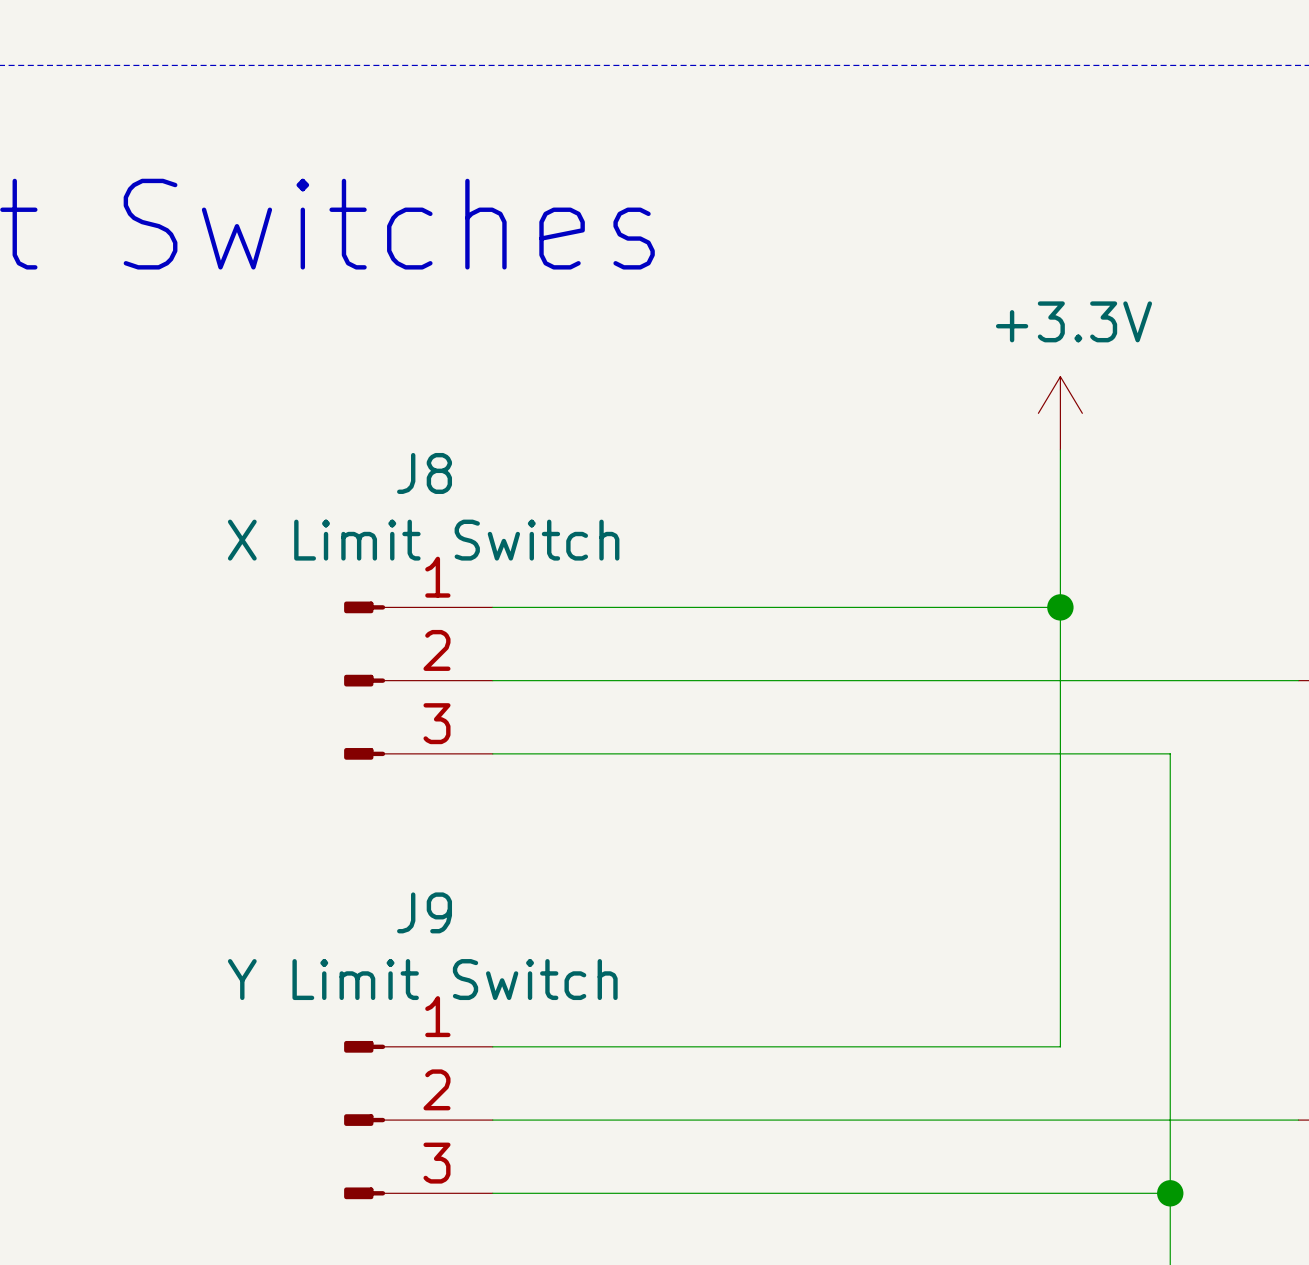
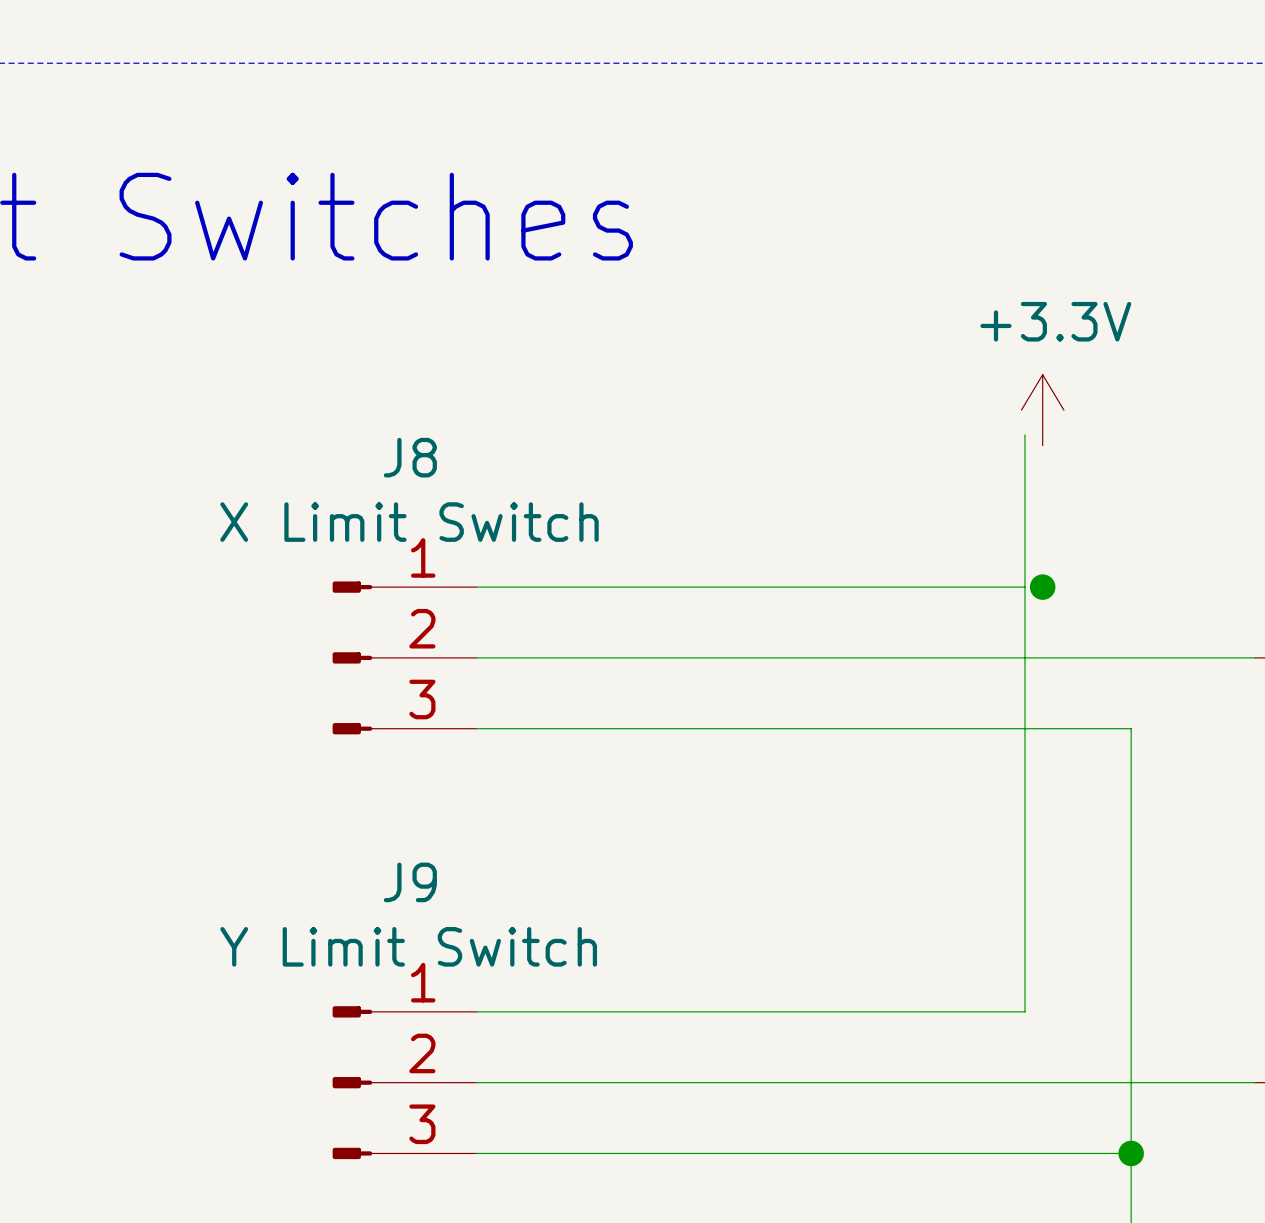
power symbol position: +3.3V (1060, 413) -> +3.3V (1042, 410)
junction position: (1060, 607) -> (1042, 587)

